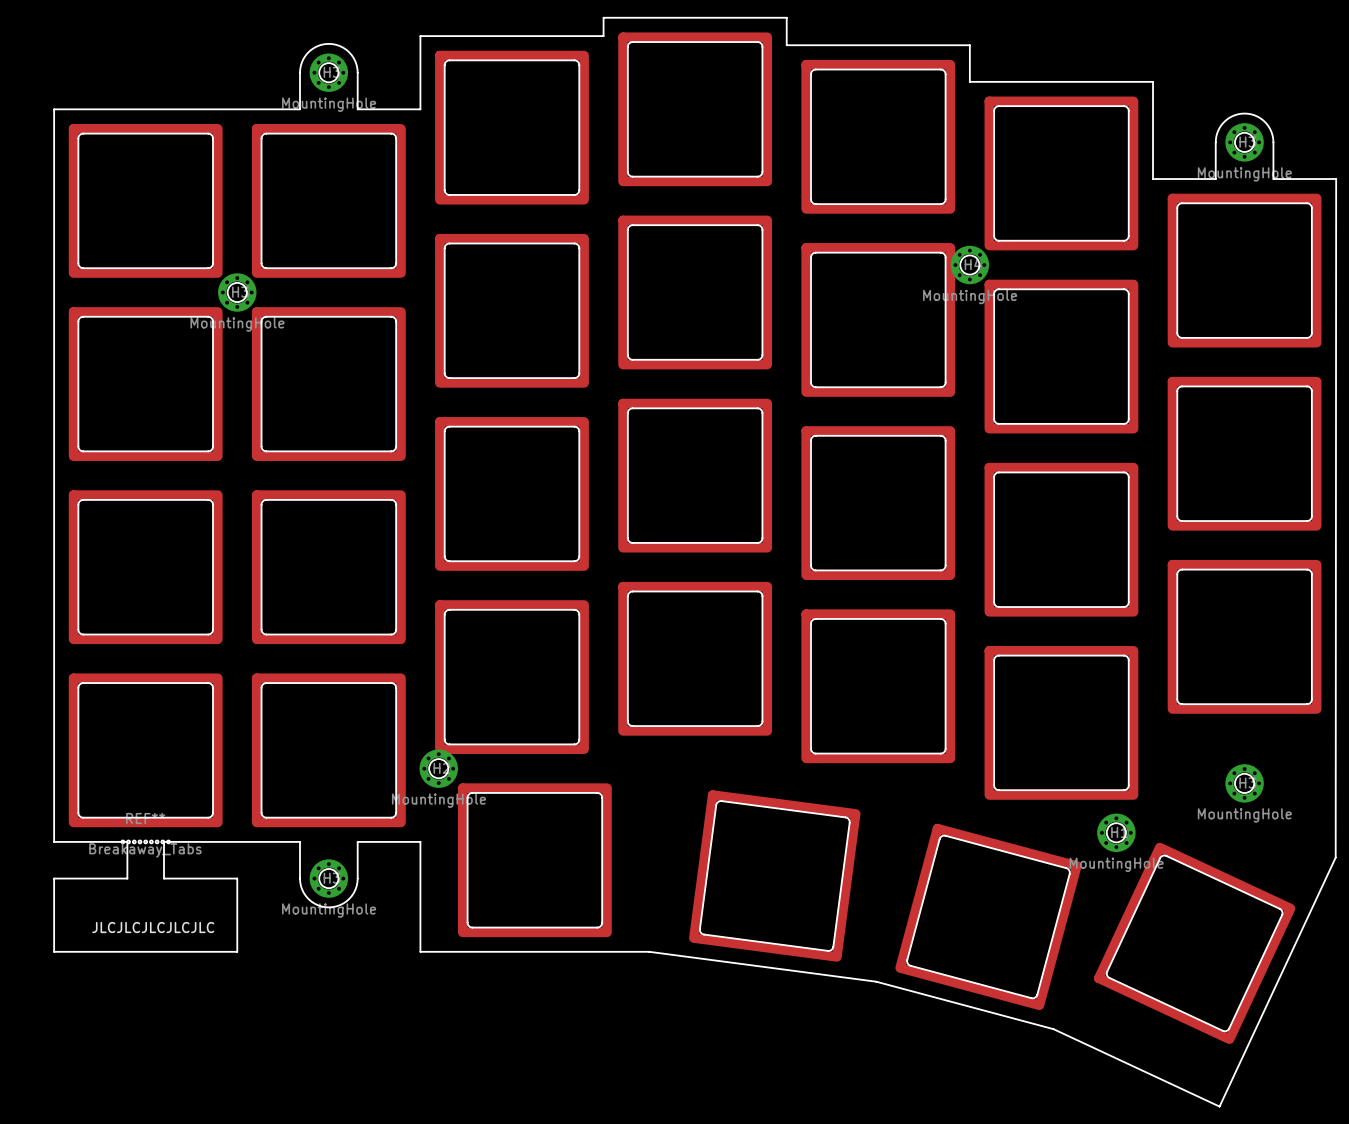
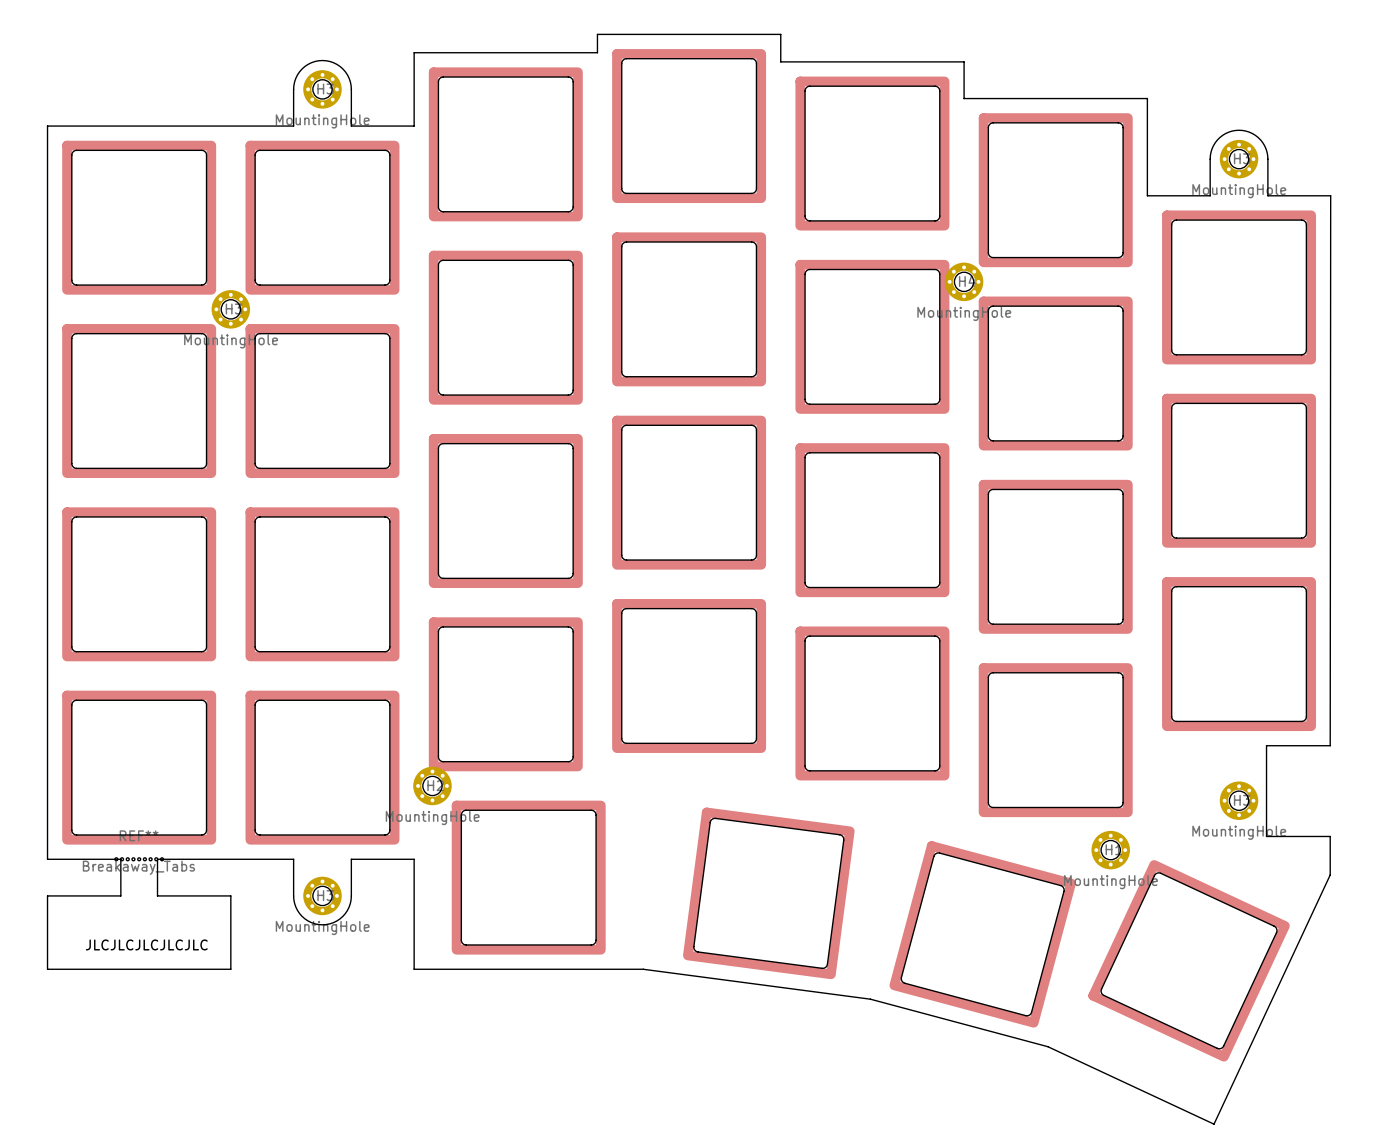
board edge: (1336, 179) (1335, 857) -> (1330, 195) (1330, 745) (1266, 745) (1266, 836) (1330, 836) (1330, 874)

